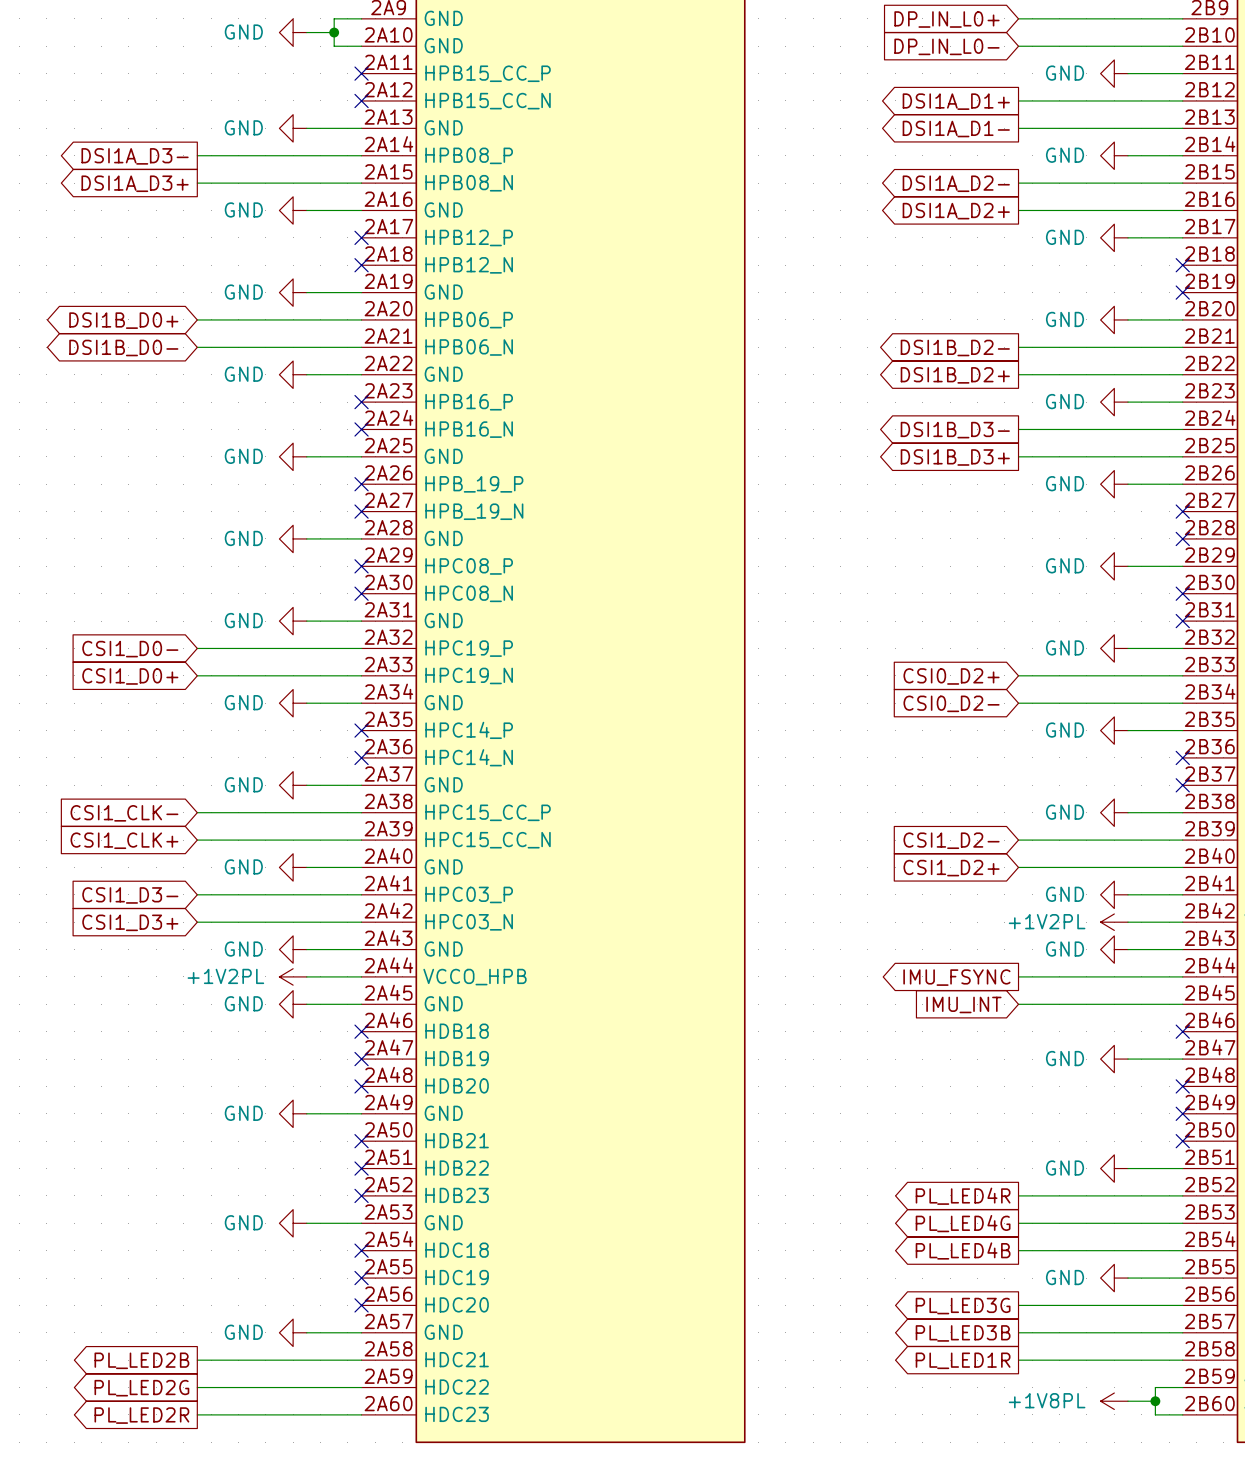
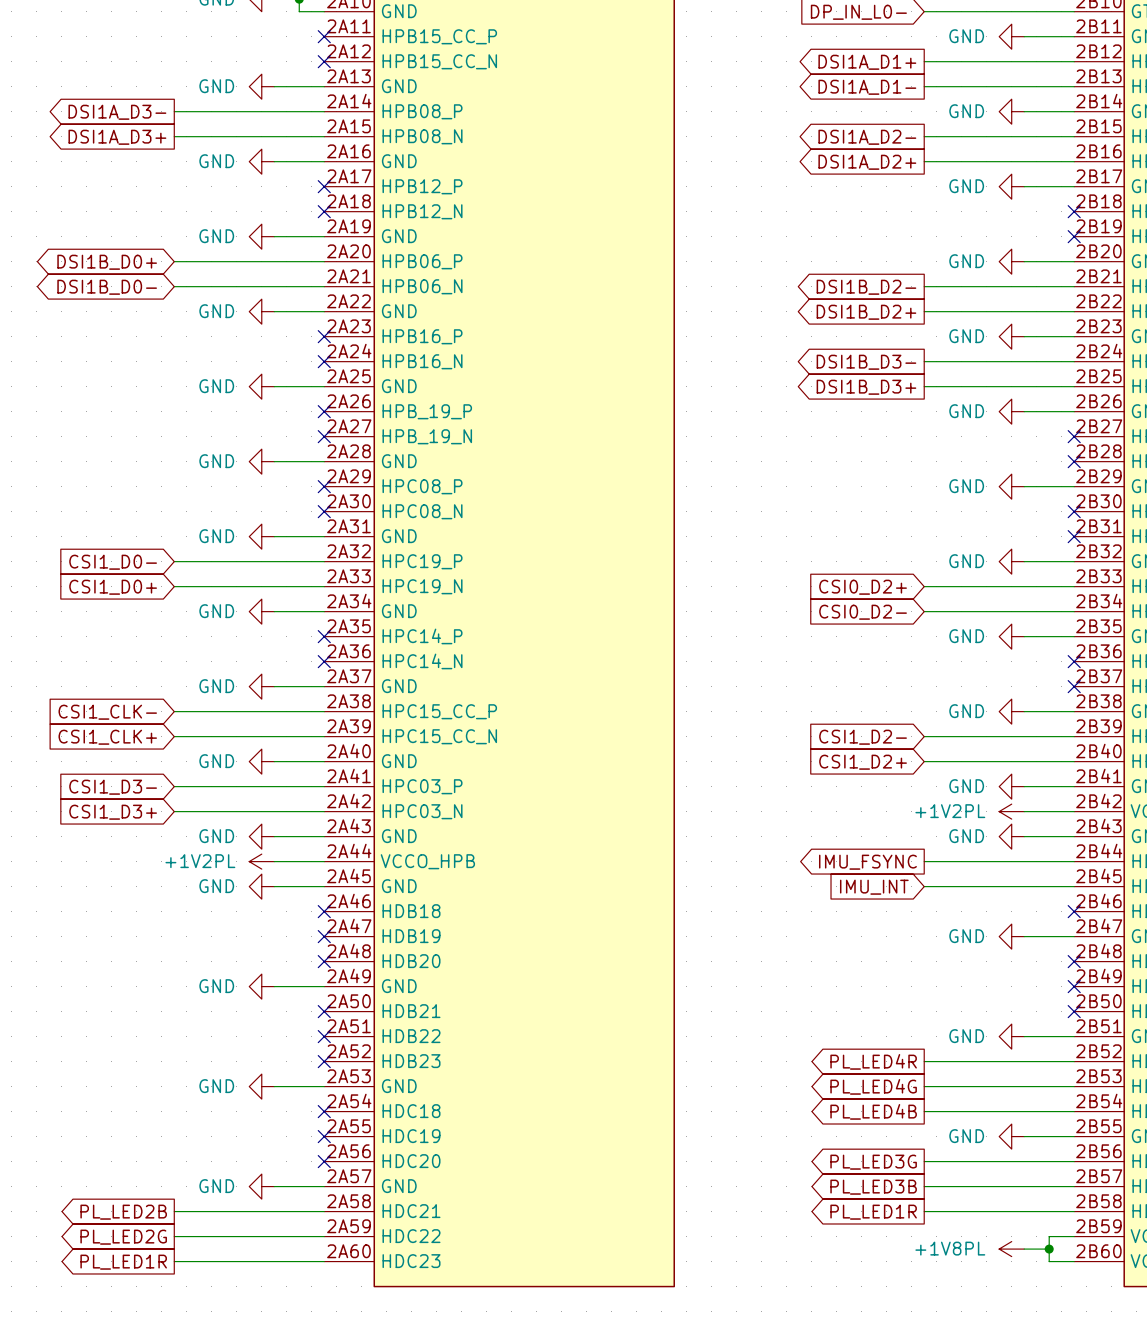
global label: PL_LED2R (141, 1415) -> PL_LED1R (123, 1262)

